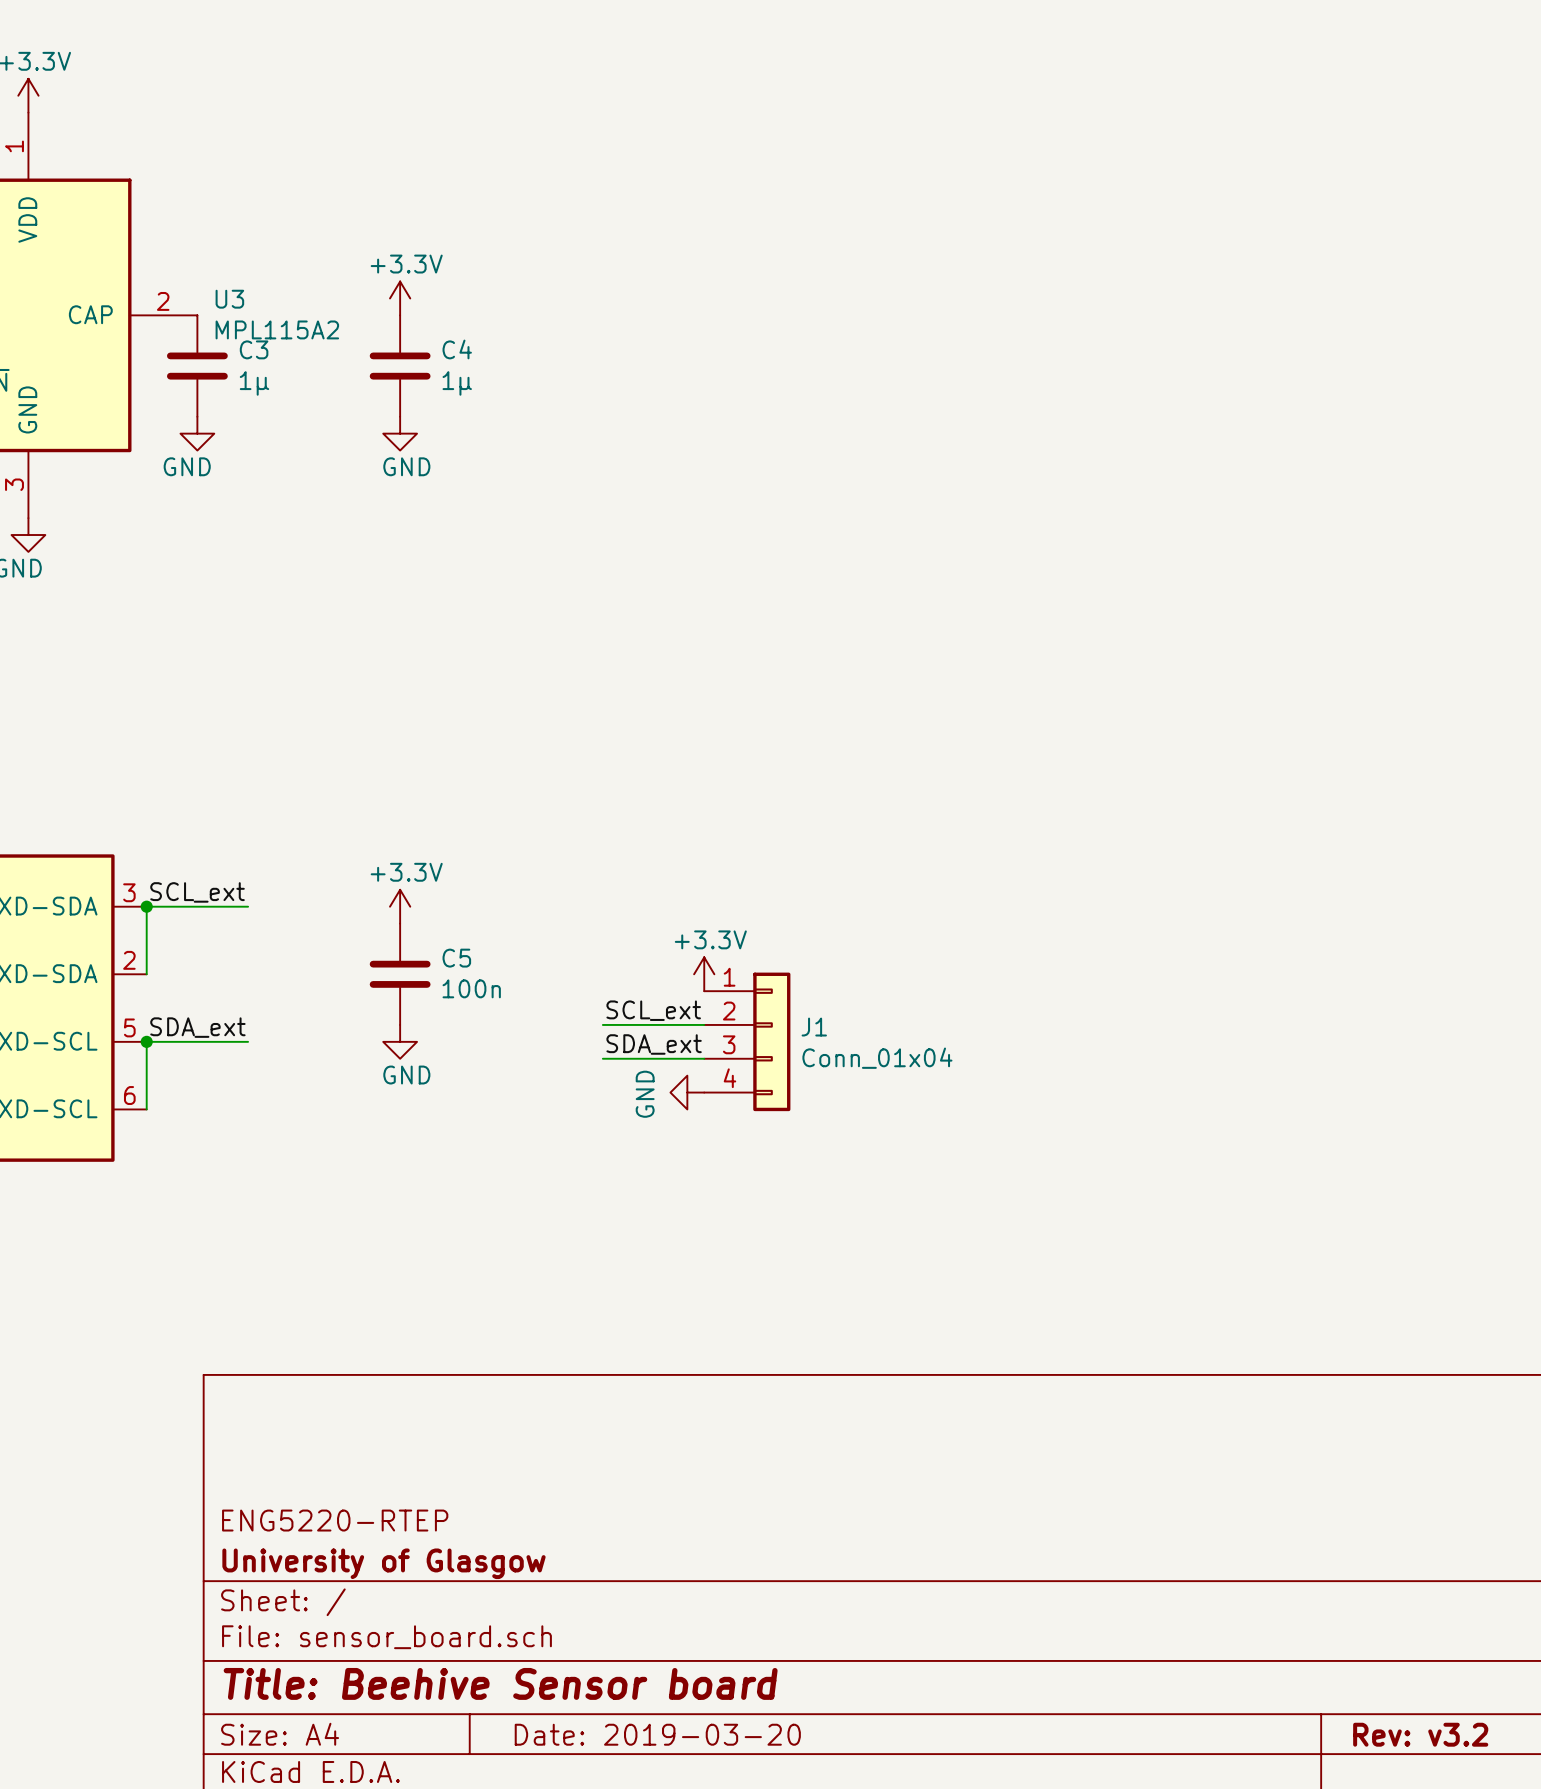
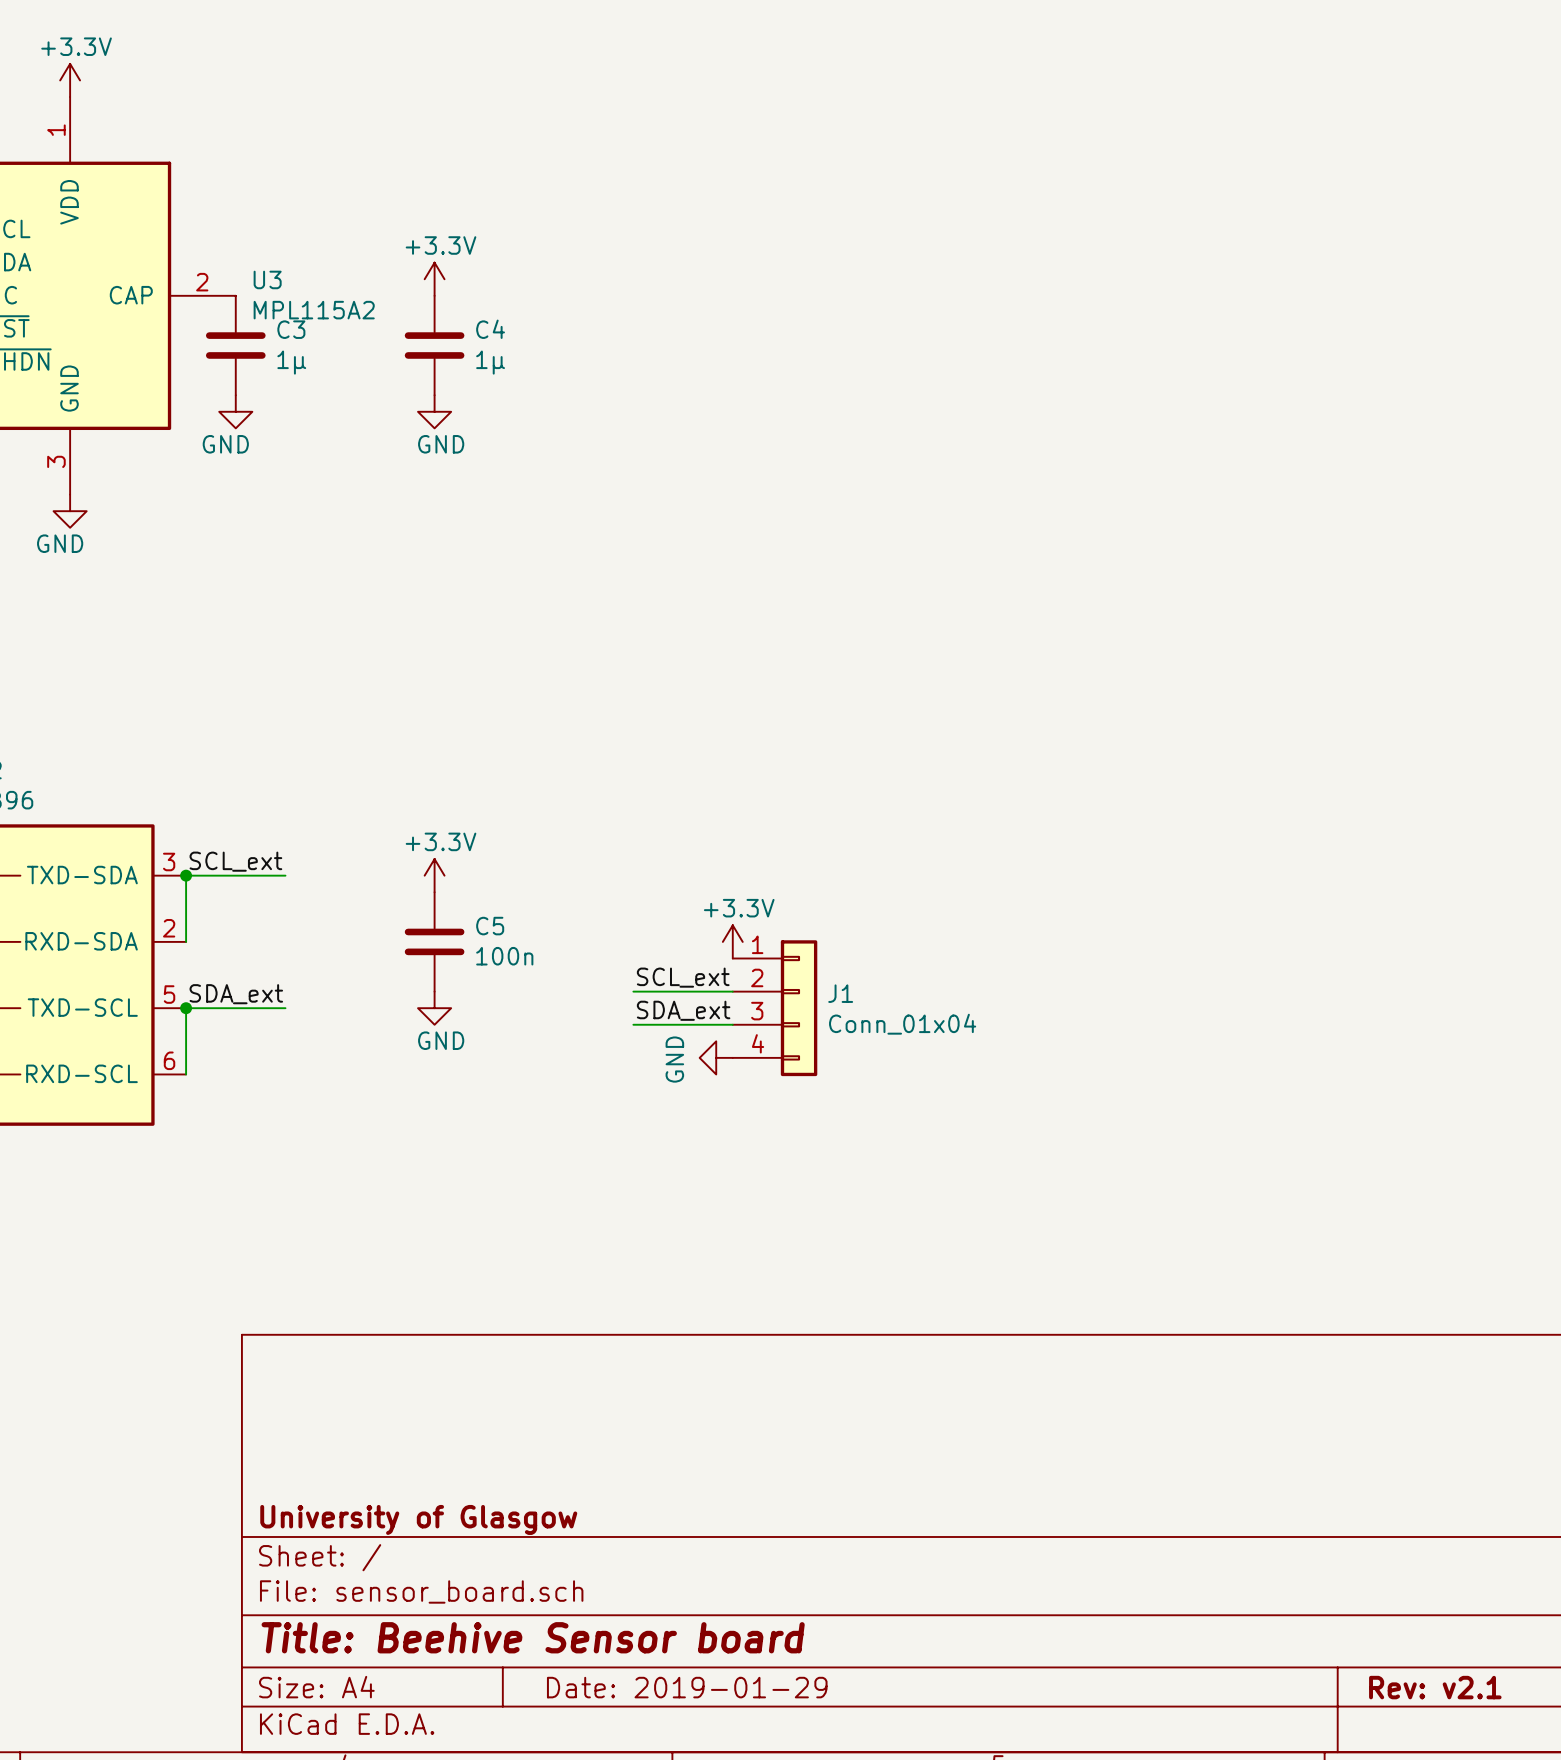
title block: ENG5220-RTEP (335, 1520) -> none
title block: Date: 2019-03-20 (657, 1734) -> Date: 2019-01-29 (687, 1687)
title block: Rev: v3.2 (1420, 1734) -> Rev: v2.1 (1435, 1687)

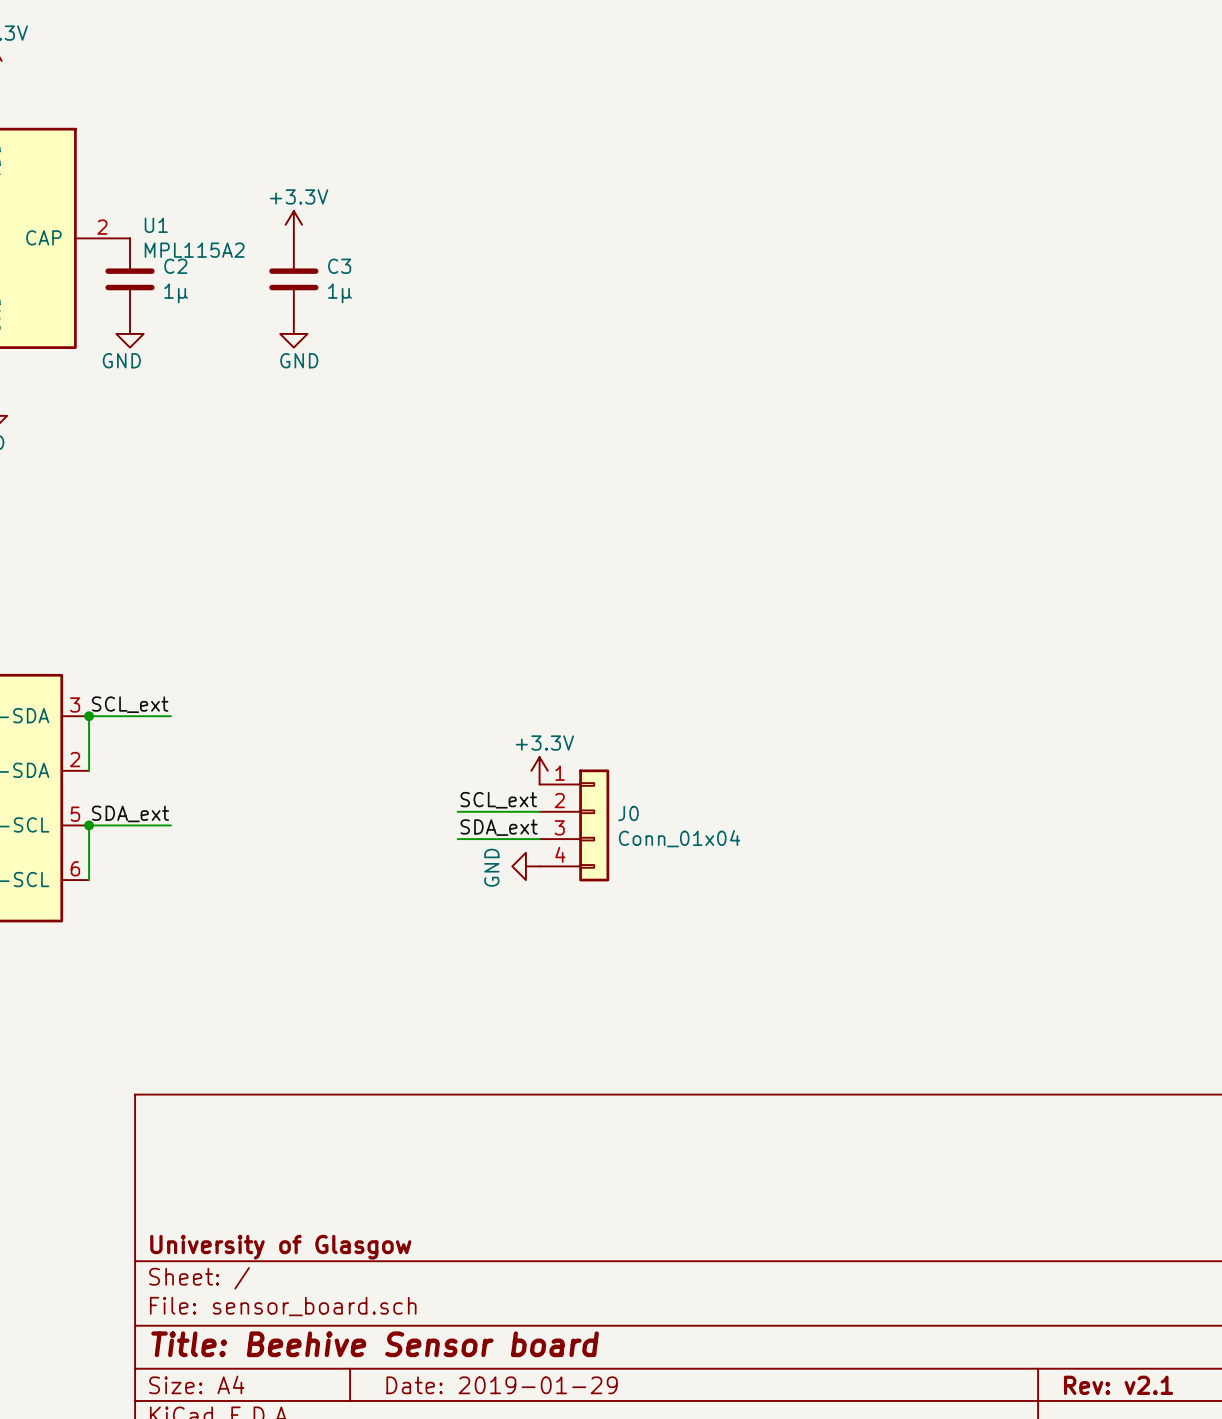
U3 name: U3 (267, 279) -> U1 (156, 225)
C3 name: C3 (291, 329) -> C2 (175, 266)
C4 name: C4 (490, 329) -> C3 (339, 266)
power symbol: +3.3V (434, 875) -> none
C5: 100n (434, 941) -> none
J1 name: J1 (840, 993) -> J0 (628, 813)
power symbol: GND (434, 1008) -> none

